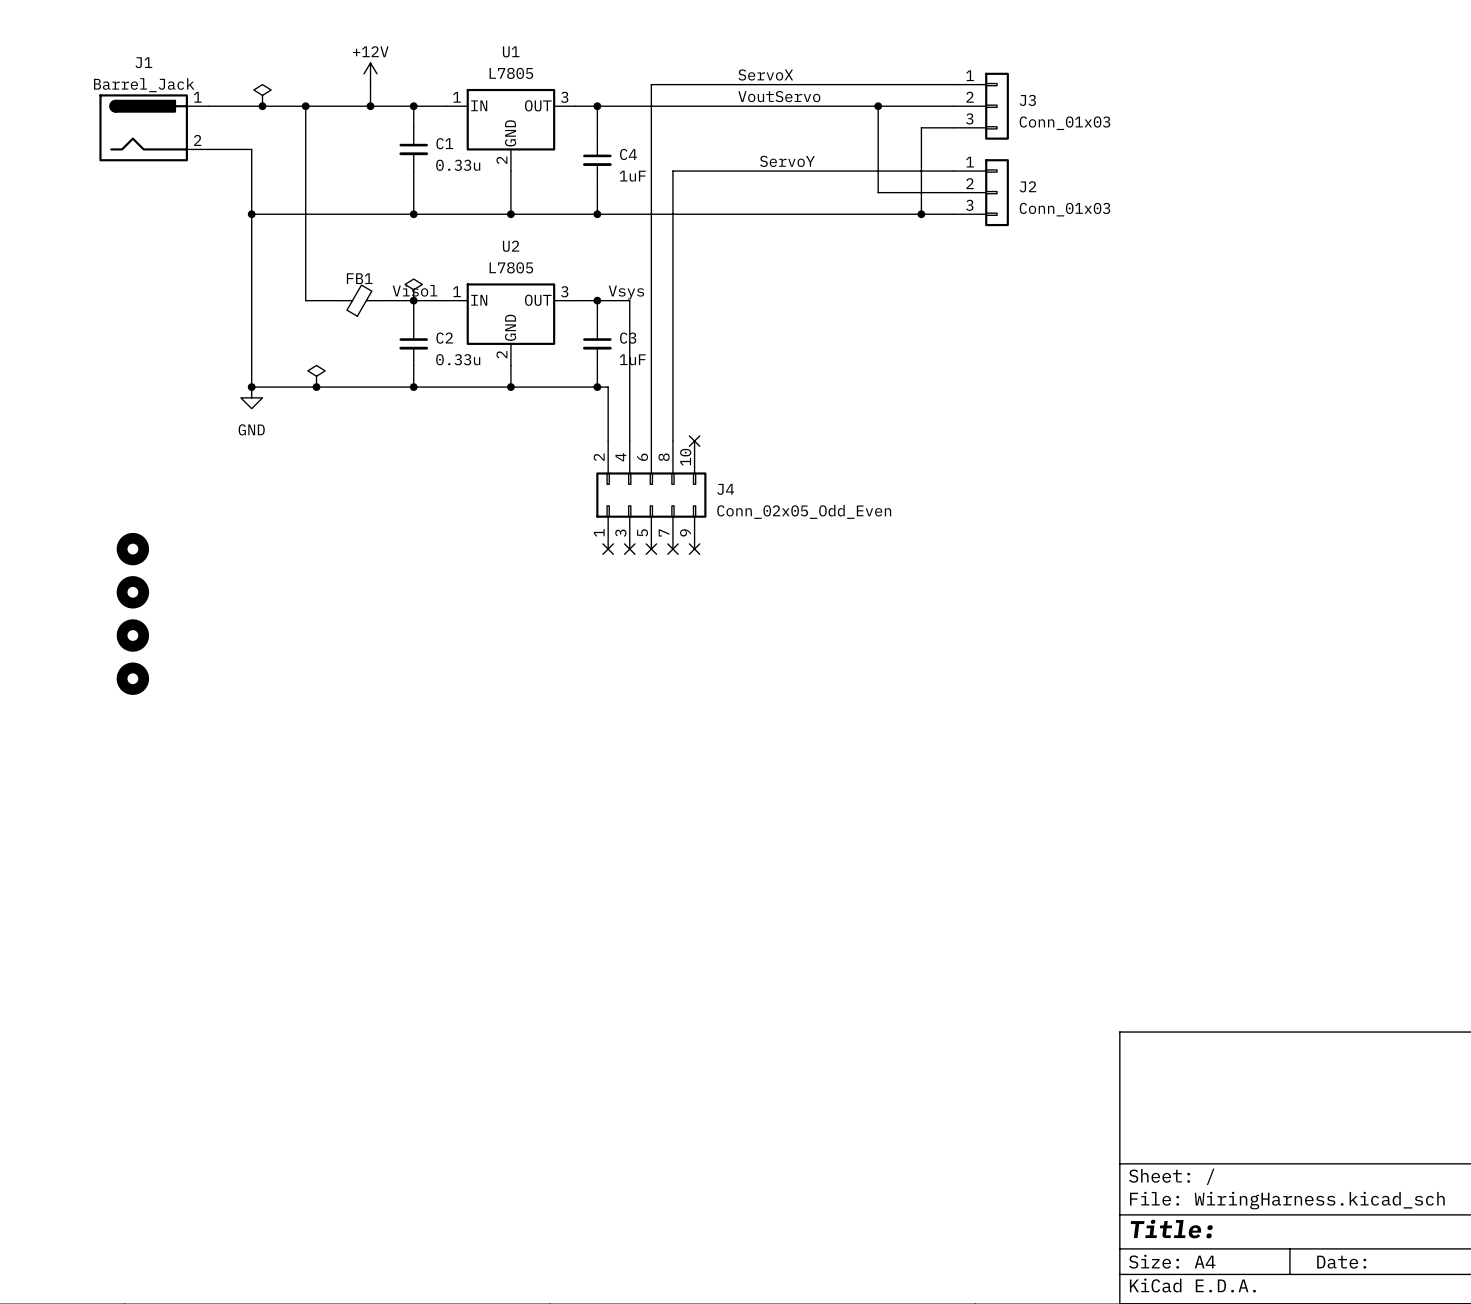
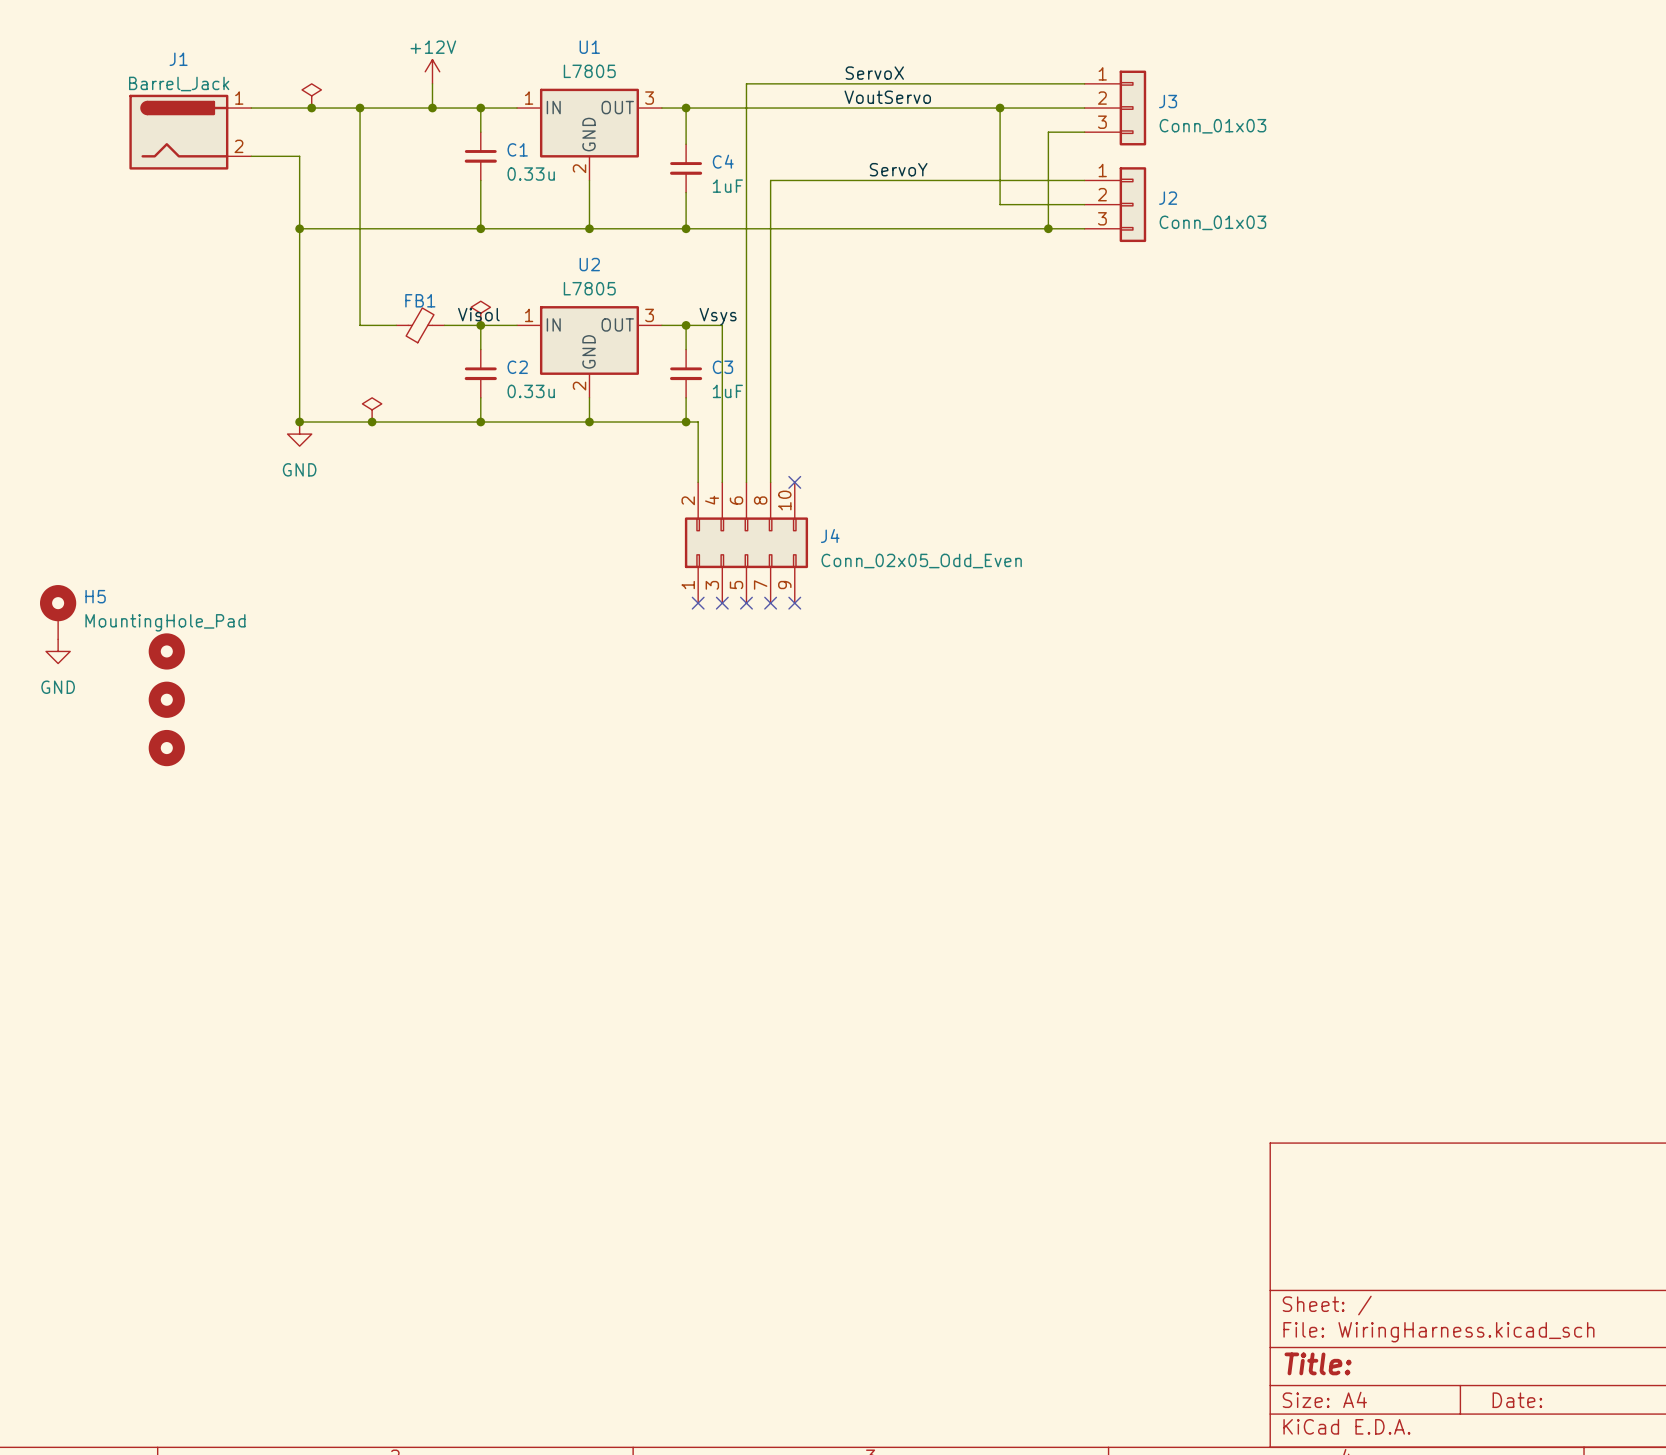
part: (132, 549) -> none
H5: none -> MountingHole_Pad (58, 612)
power symbol: none -> GND (58, 651)

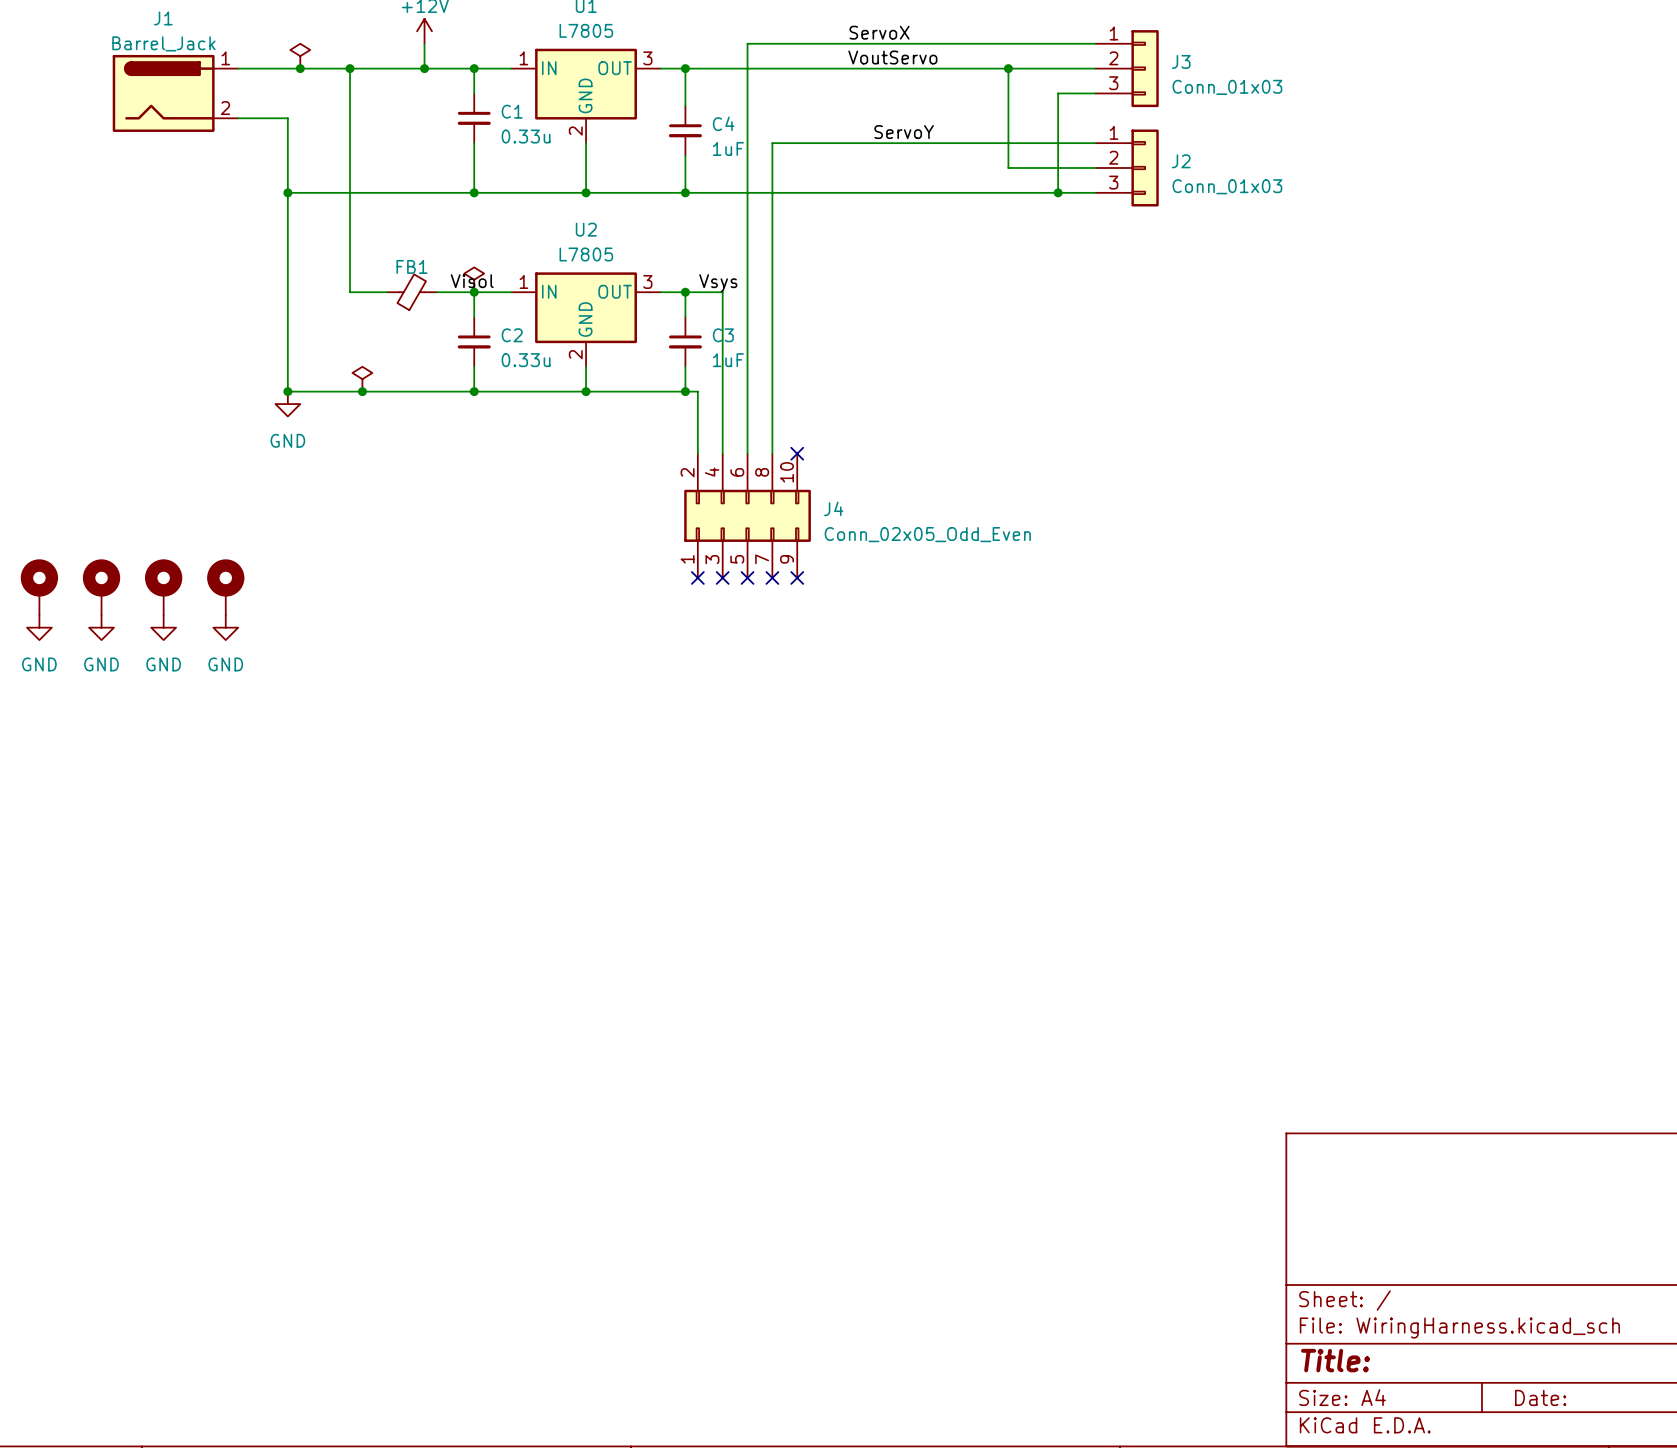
H5 name: H5 (95, 596) -> none
part: none -> (101, 587)
part: none -> (163, 587)
part: none -> (225, 587)
H5 value: MountingHole_Pad (165, 622) -> none
power symbol: none -> GND (101, 627)
part: (166, 651) -> none
power symbol: none -> GND (163, 627)
power symbol: none -> GND (225, 627)
part: (166, 699) -> none
part: (166, 748) -> none

